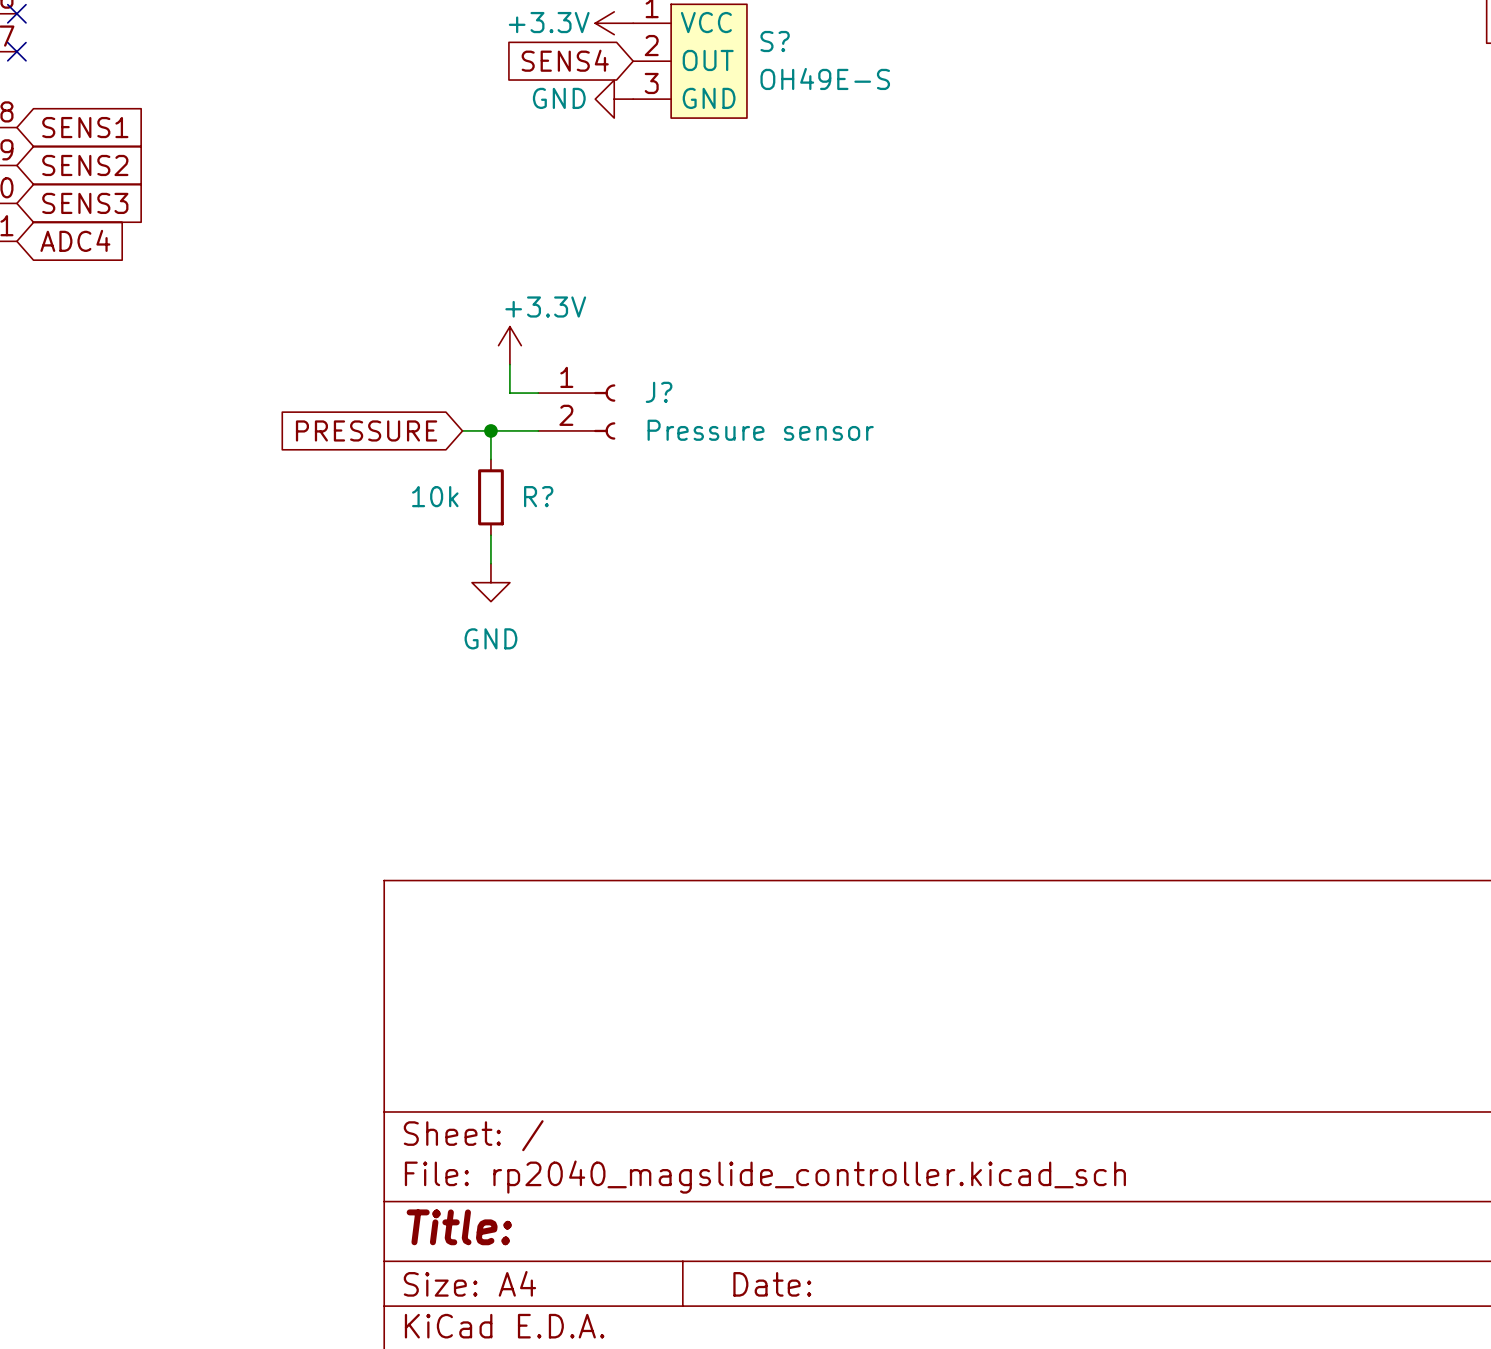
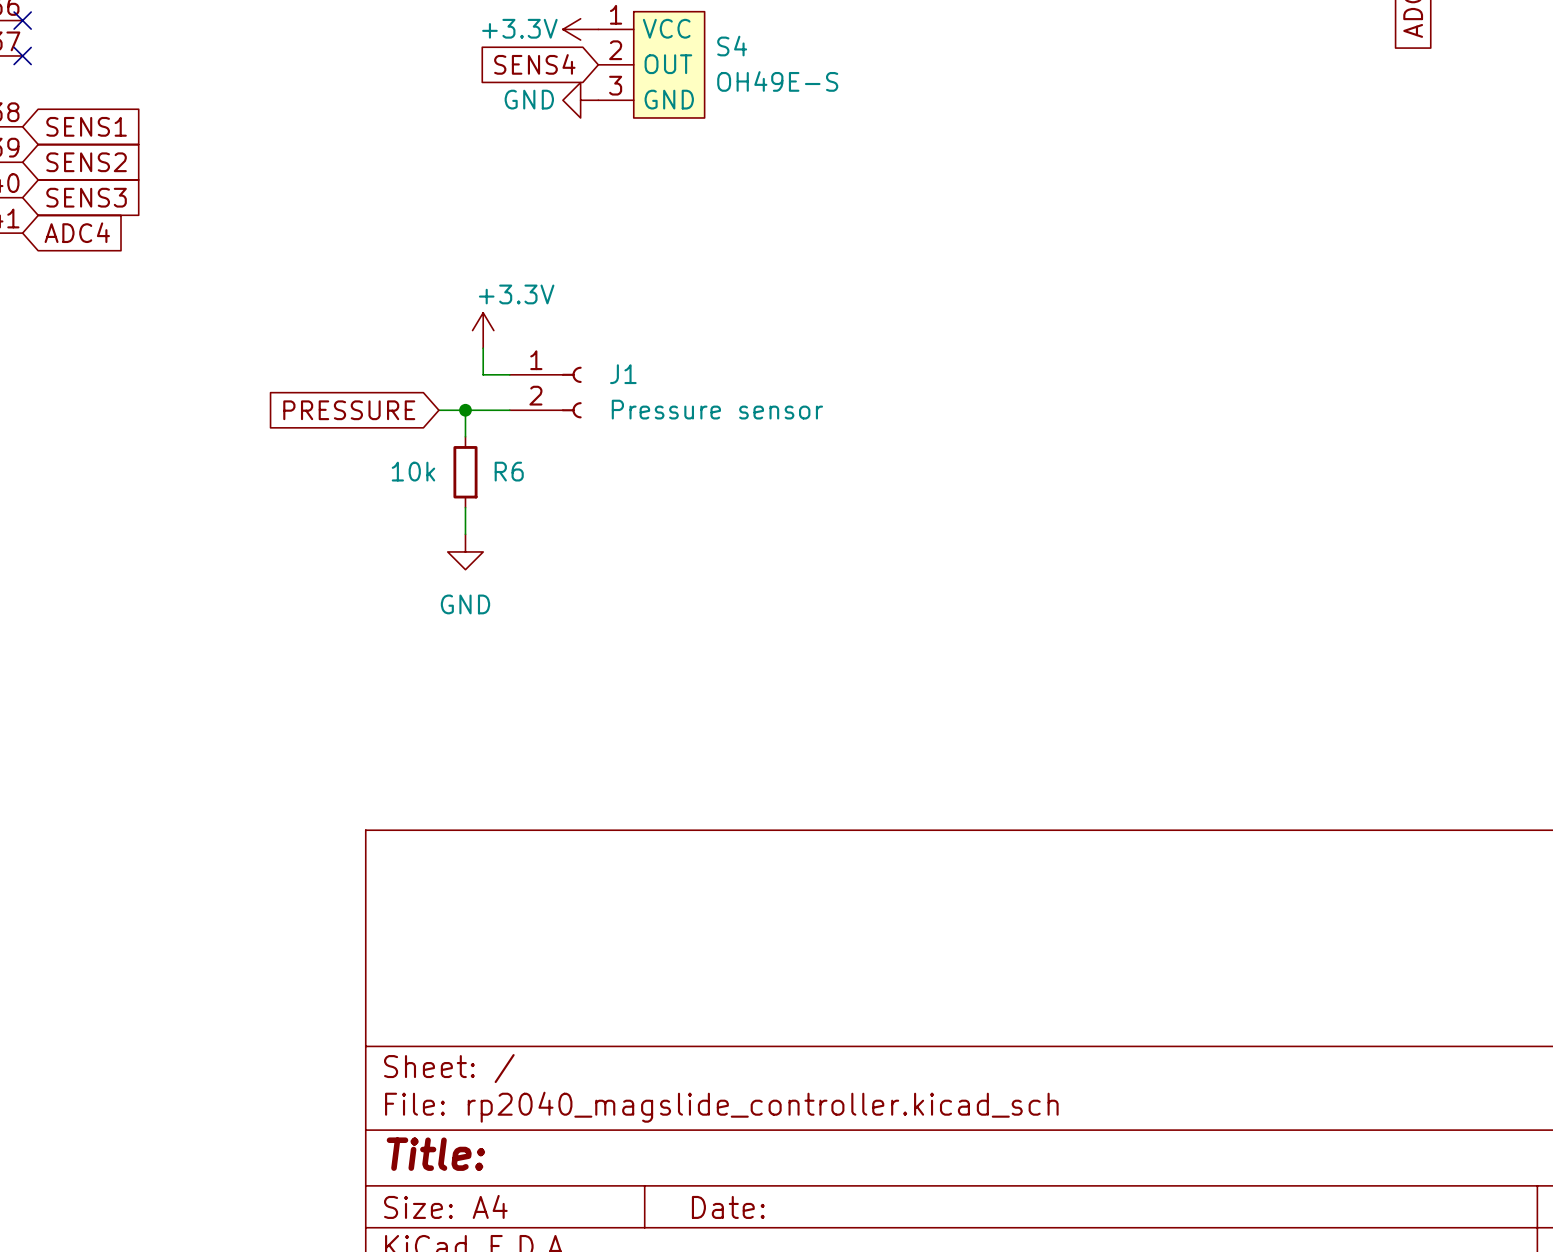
S? name: S? (775, 41) -> S4 (732, 46)
J? name: J? (659, 392) -> J1 (623, 374)
R? name: R? (538, 496) -> R6 (509, 471)

